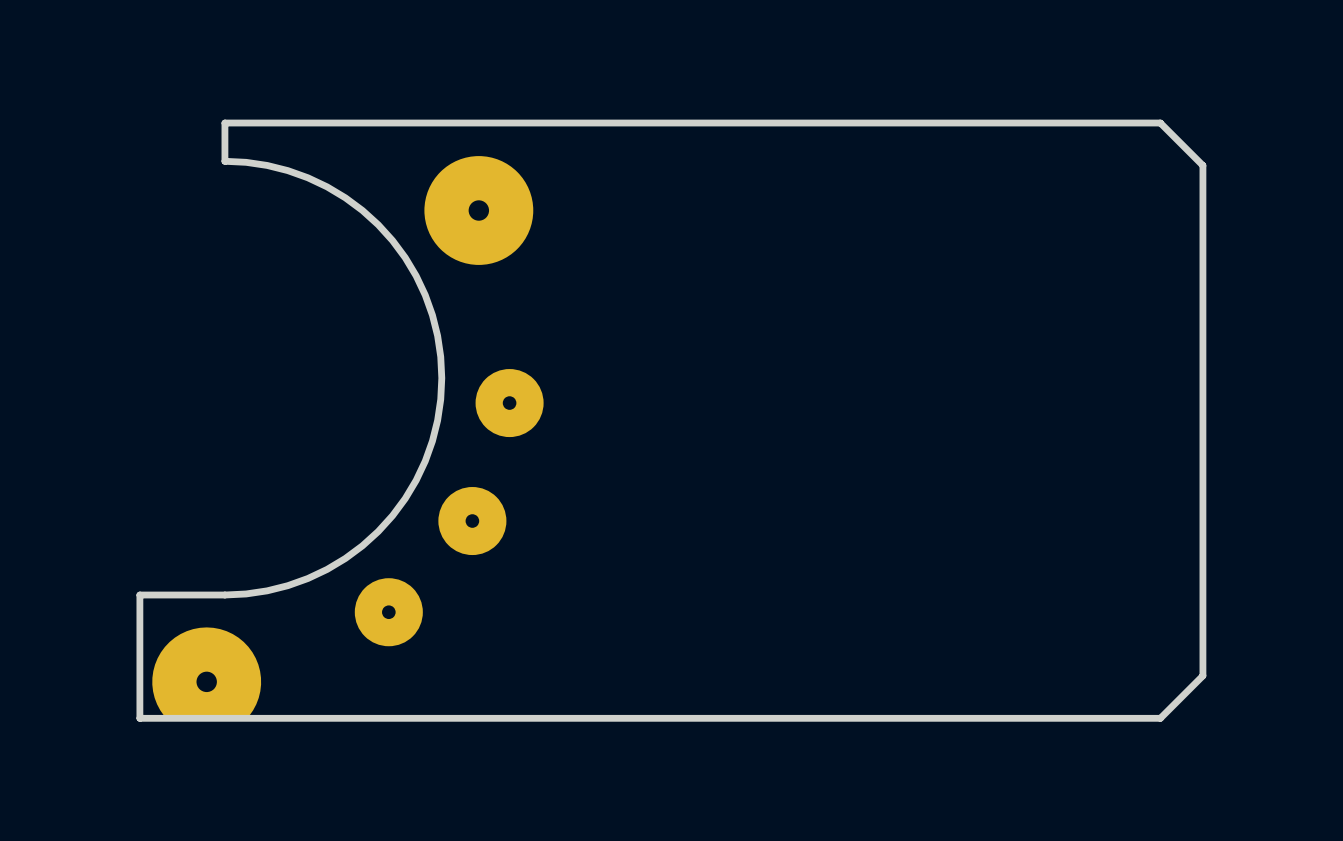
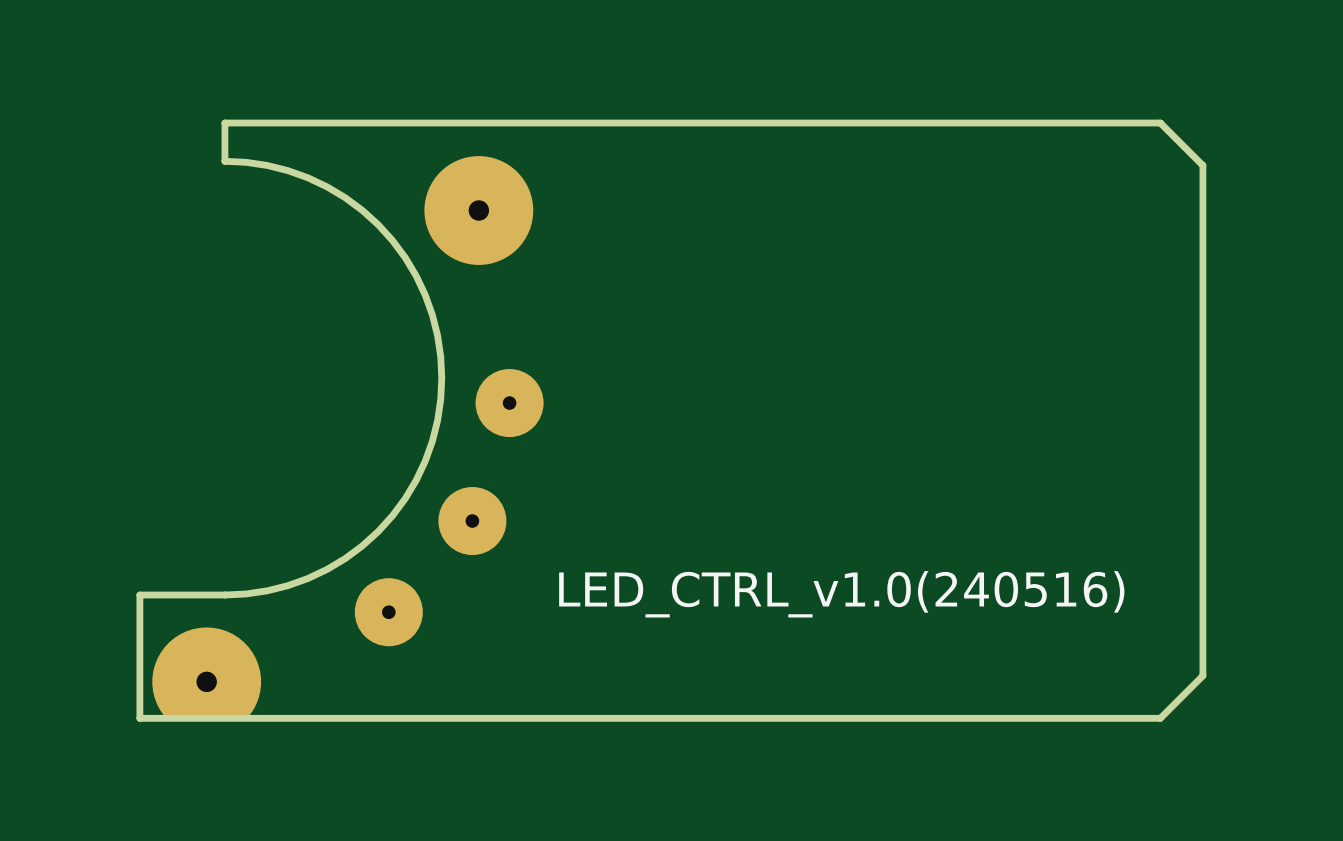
text: none -> LED_CTRL_v1.0(240516) (841, 594)

